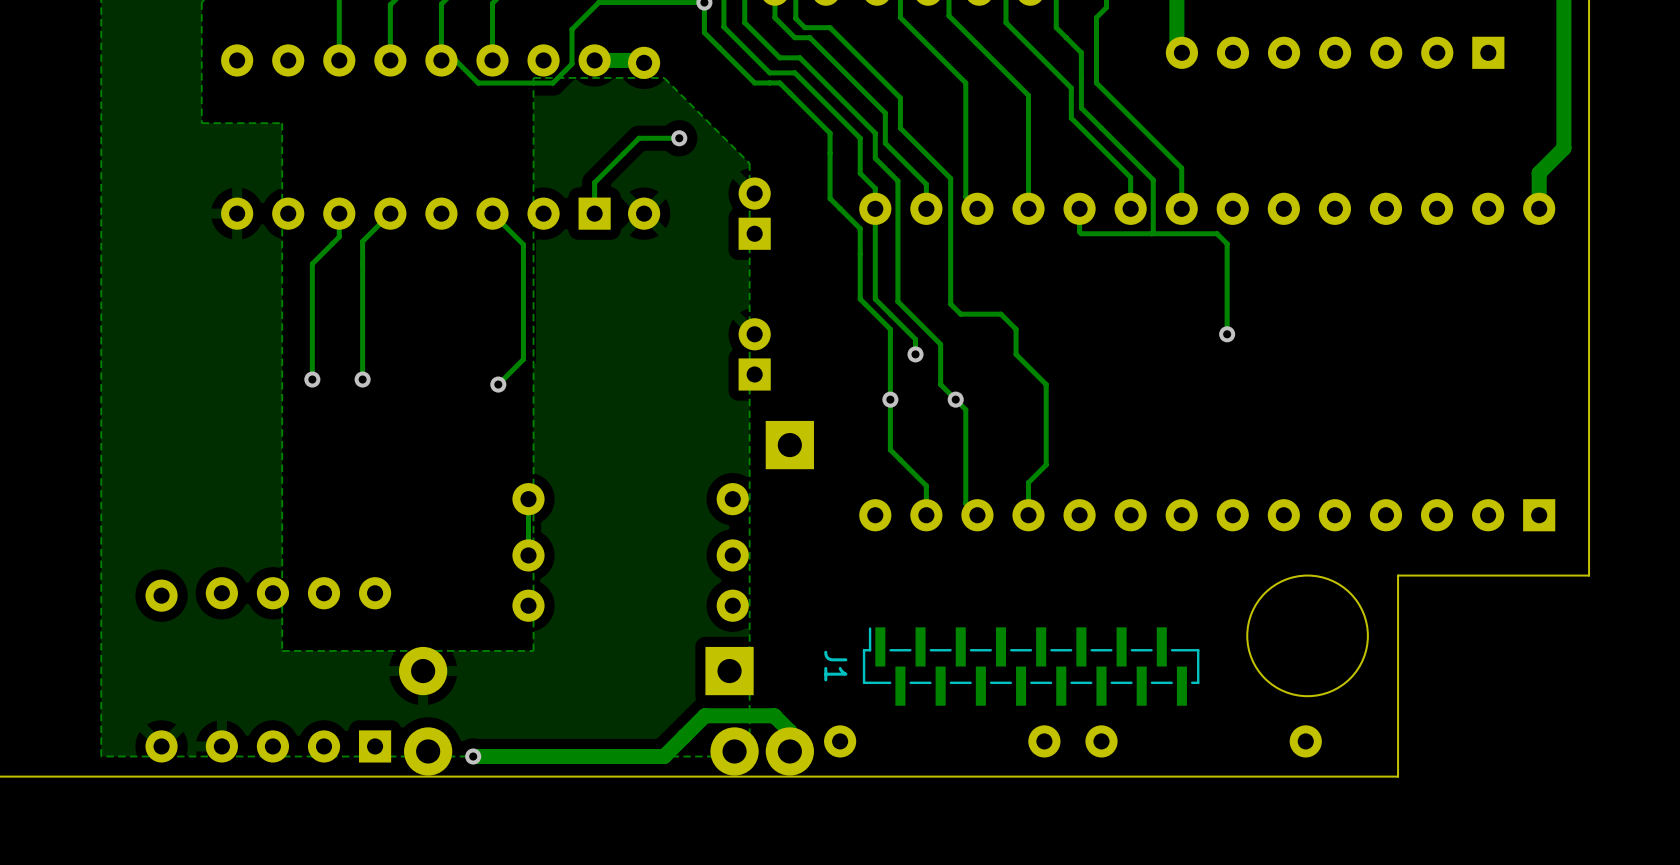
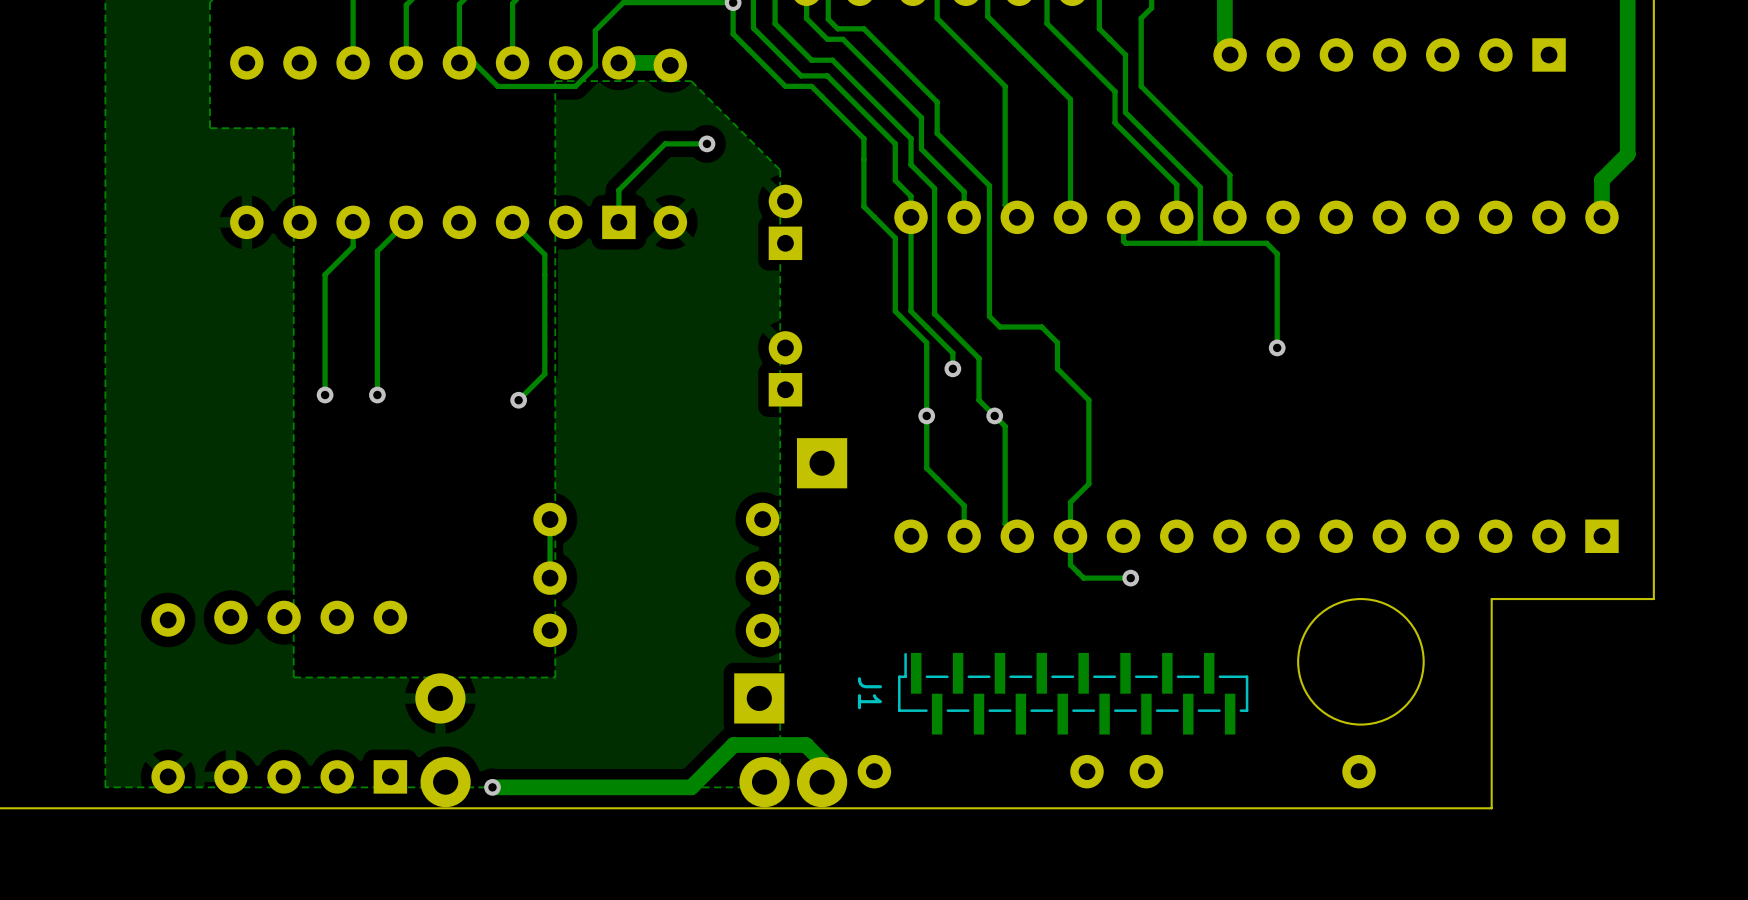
track: none -> (1070, 536) (1070, 564) (1083, 578) (1130, 578)
via: none -> (1130, 578)
board edge: (1433, 575) (1398, 575) (1398, 776) -> (1491, 599) (1491, 808) (1455, 808)

